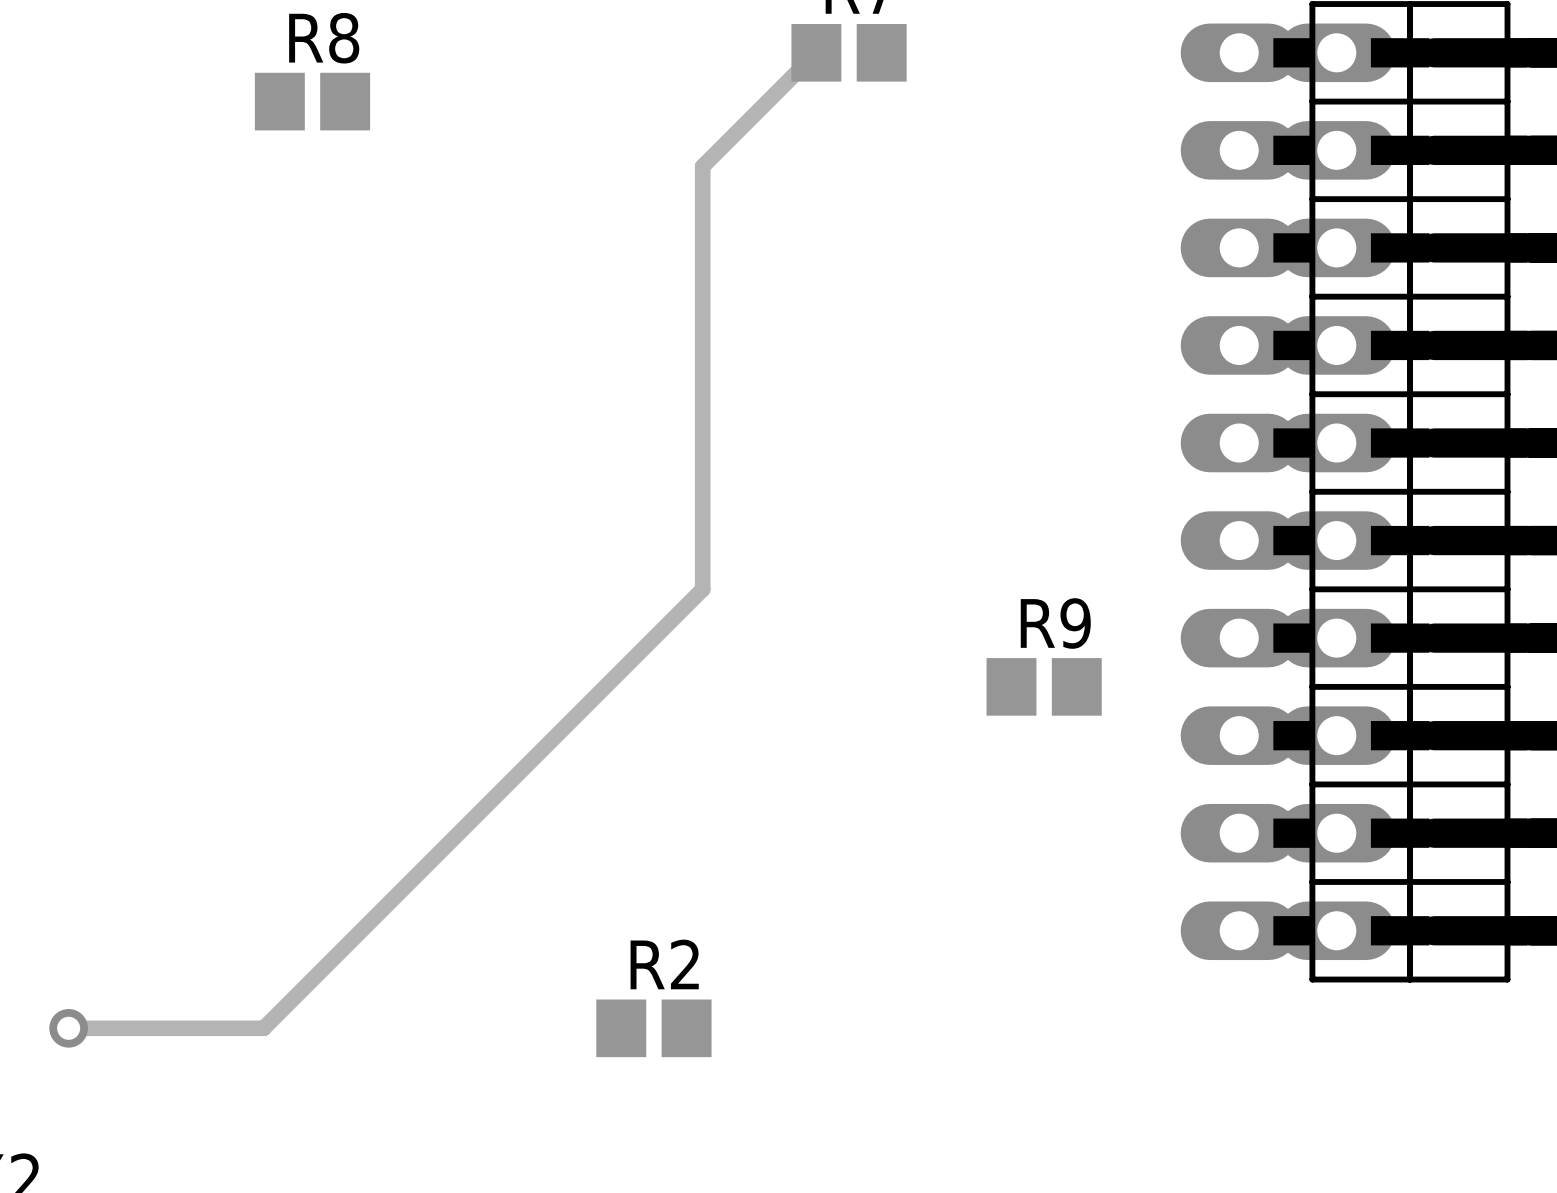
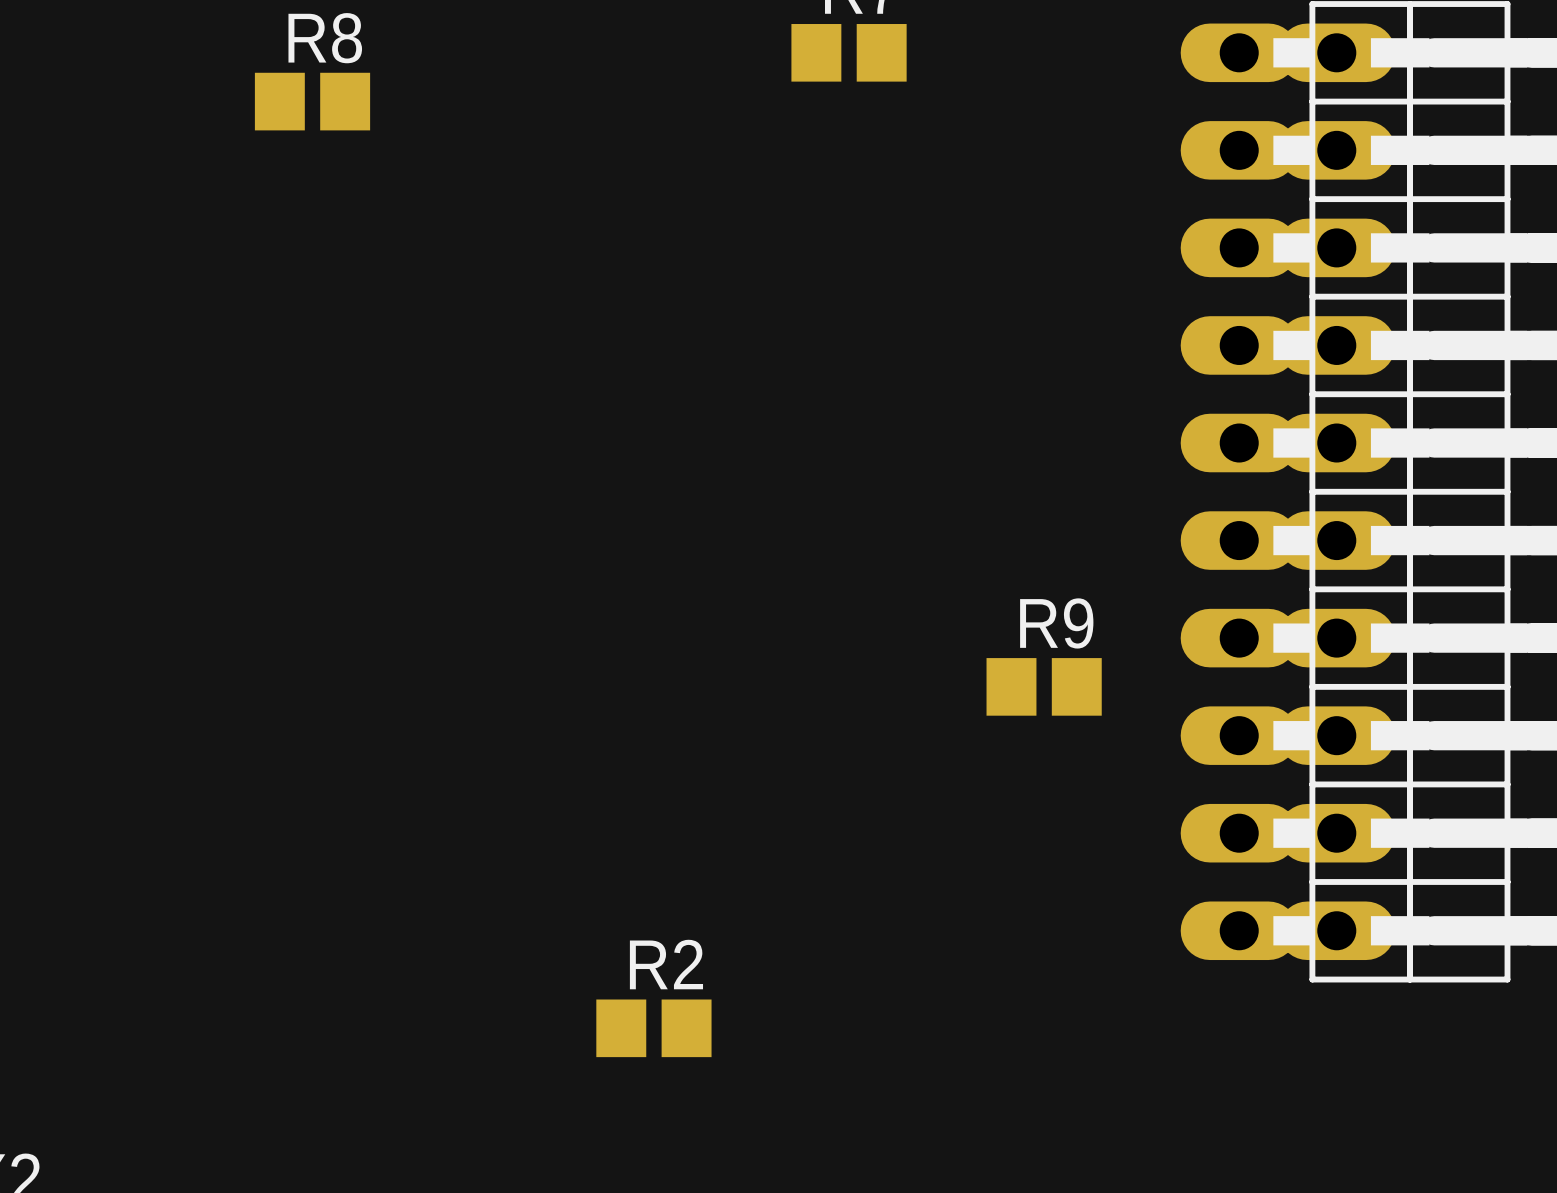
track: (816, 52) (702, 166) (702, 589) (263, 1028) (68, 1028) -> none
via: (68, 1028) -> none

